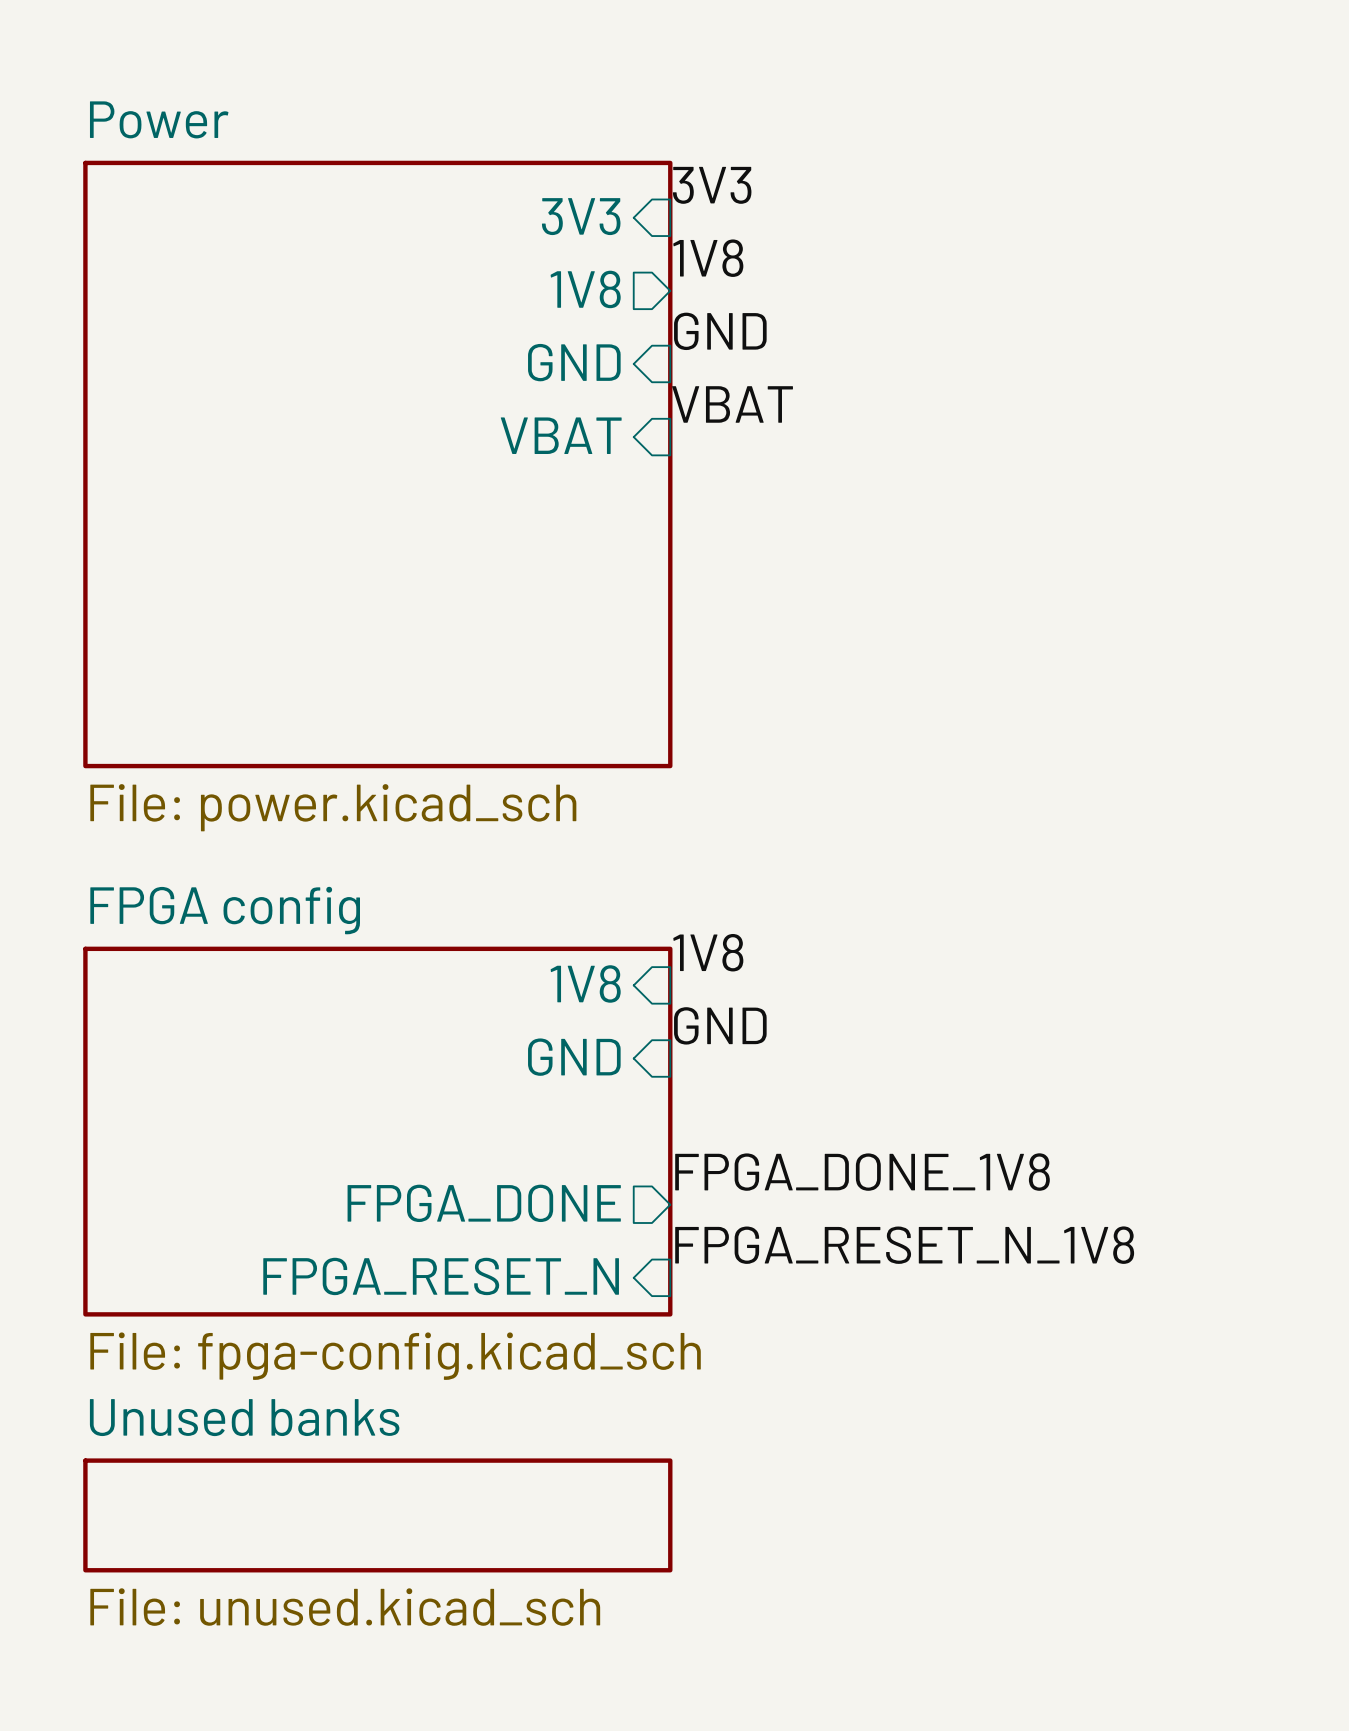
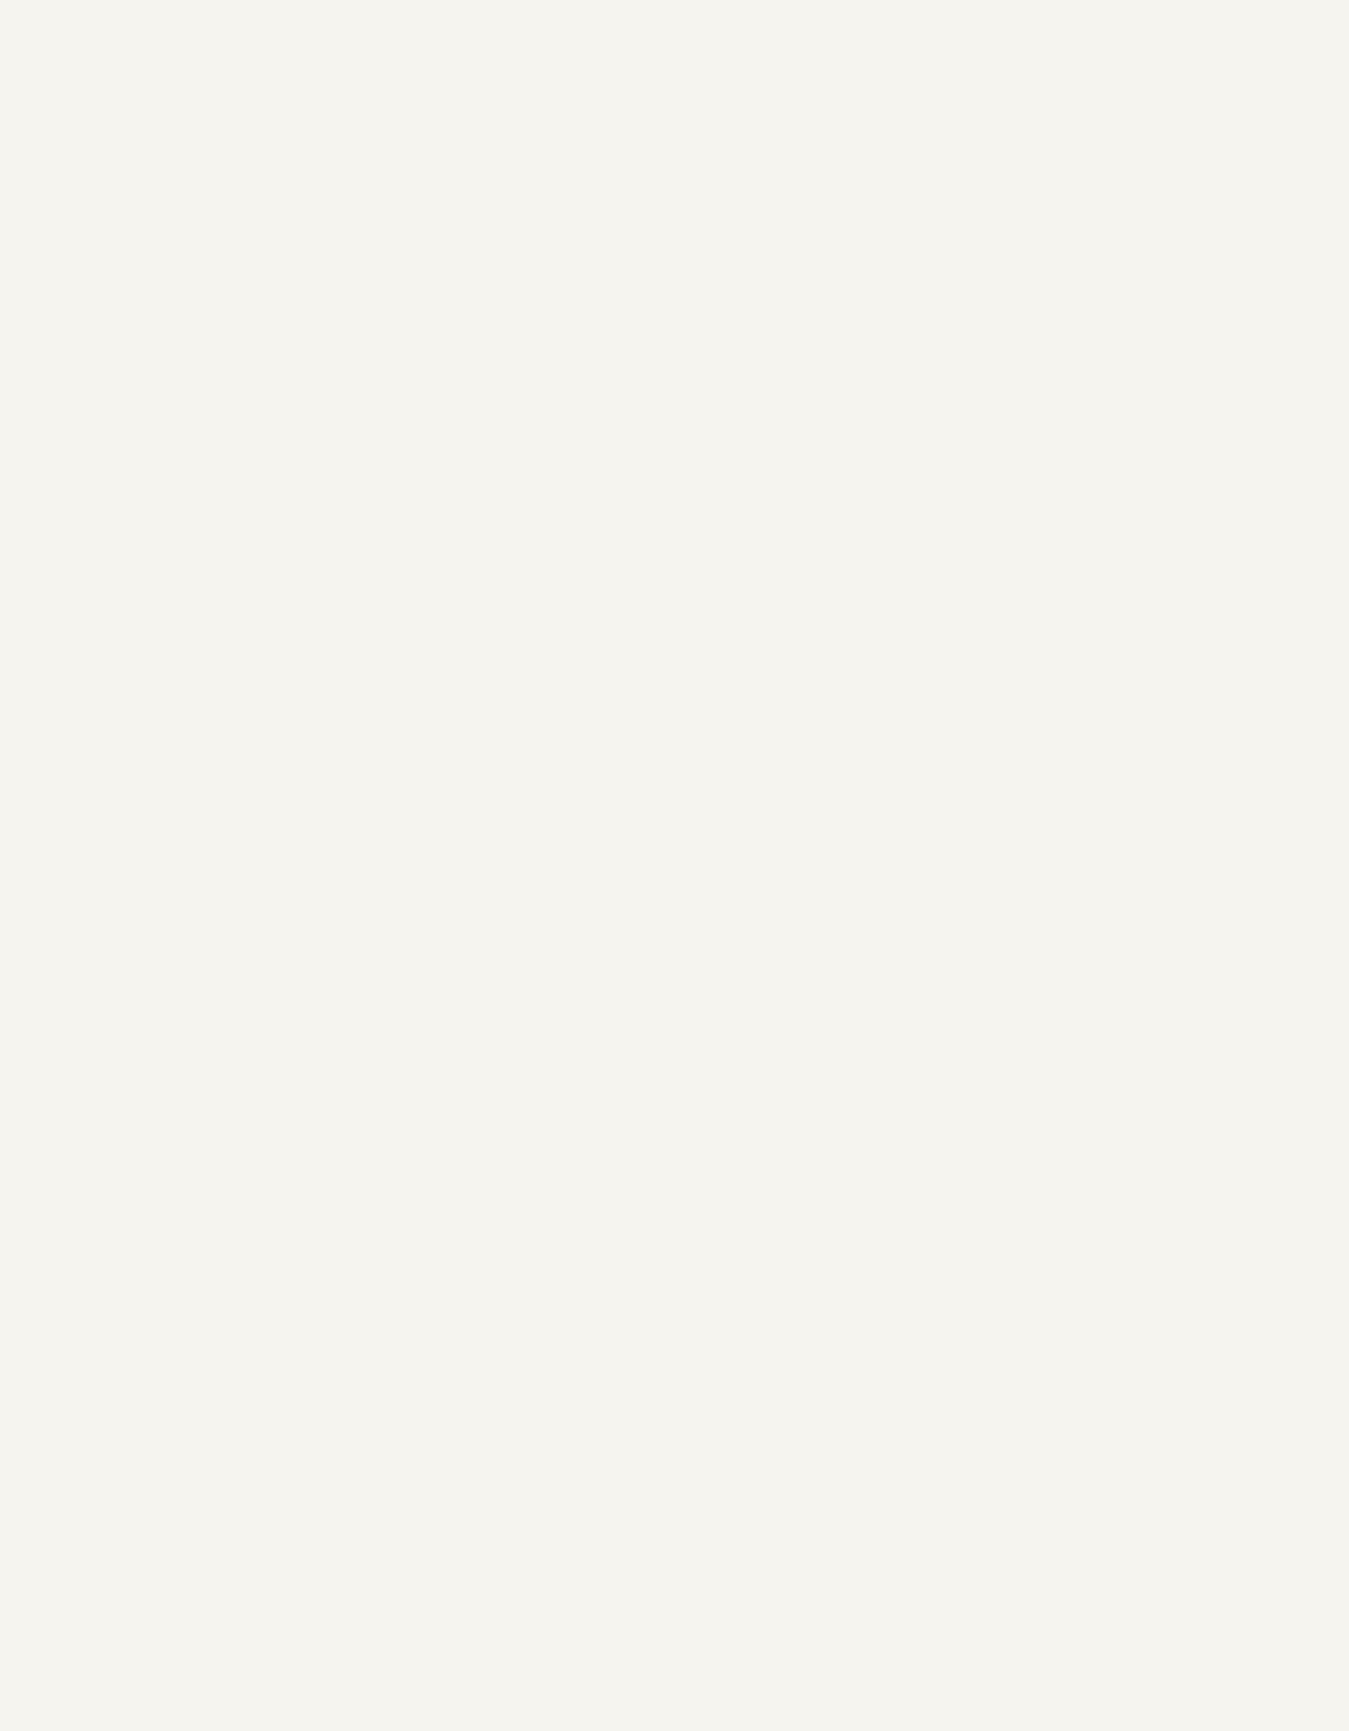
label: 3V3 (712, 185) -> none
sheet pin: 3V3 (581, 216) -> none
label: 1V8 (708, 258) -> none
sheet pin: 1V8 (585, 289) -> none
label: GND (720, 331) -> none
sheet pin: GND (574, 362) -> none
label: VBAT (732, 404) -> none
sheet pin: VBAT (561, 435) -> none
sheet Power: File: power.kicad_sch (377, 464) -> none
label: 1V8 (708, 952) -> none
sheet pin: 1V8 (585, 983) -> none
label: GND (720, 1025) -> none
sheet pin: GND (574, 1057) -> none
sheet FPGA config: File: fpga-config.kicad_sch (377, 1131) -> none
label: FPGA_DONE_1V8 (862, 1172) -> none
sheet pin: FPGA_DONE (484, 1203) -> none
label: FPGA_RESET_N_1V8 (904, 1245) -> none
sheet pin: FPGA_RESET_N (441, 1276) -> none
sheet Unused banks: File: unused.kicad_sch (377, 1515) -> none

